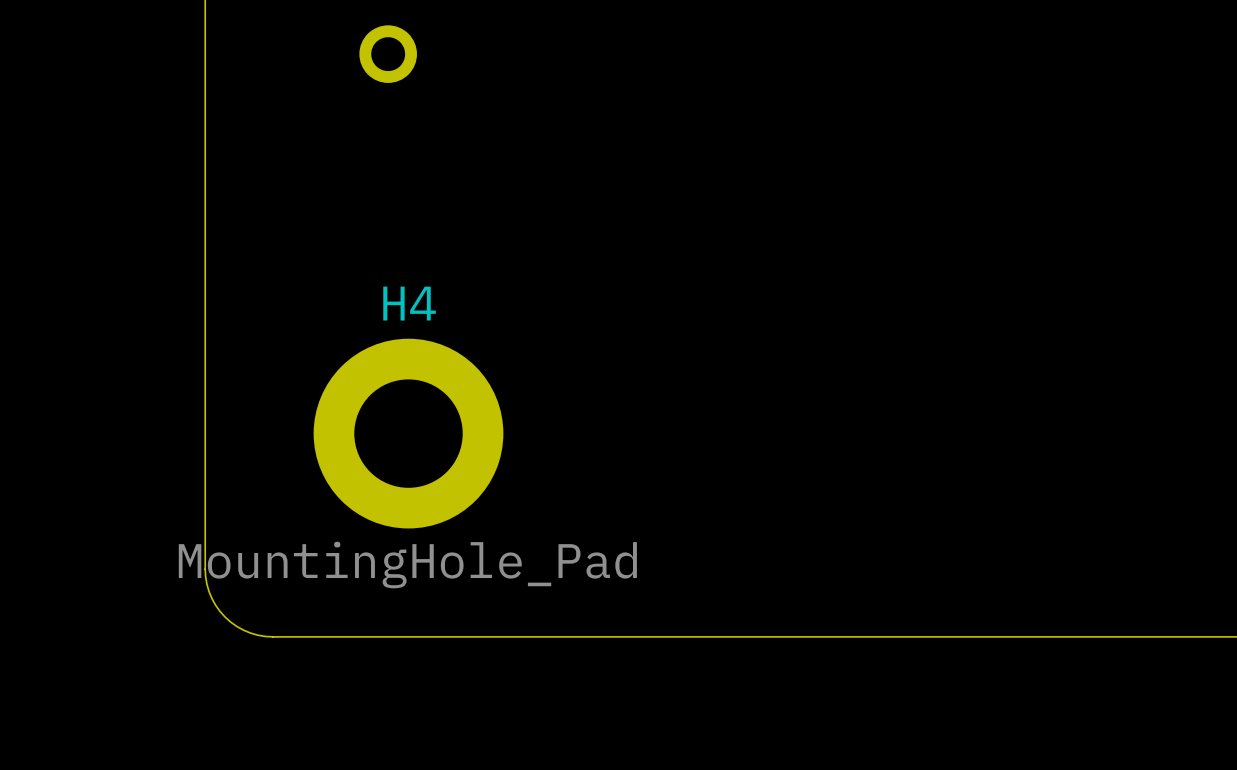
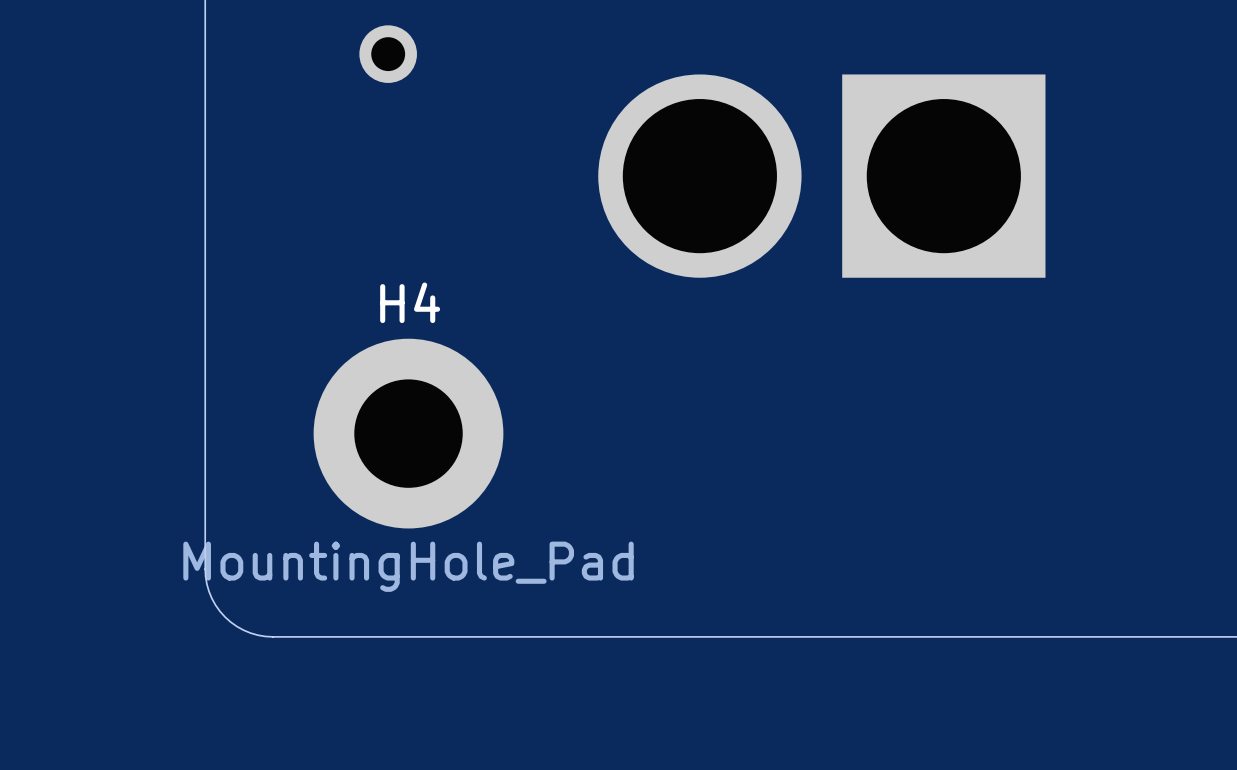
part: none -> (821, 176)

